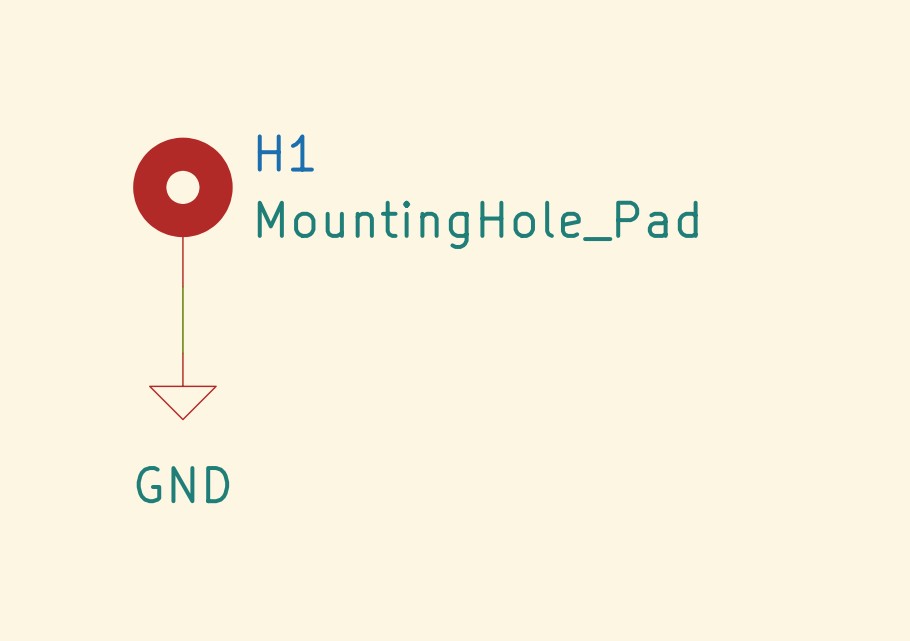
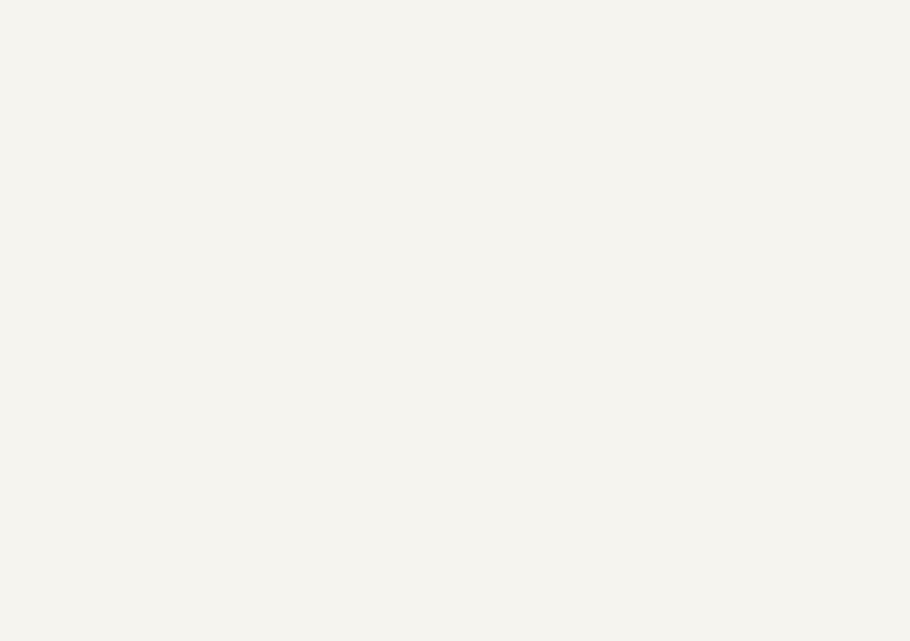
H1: MountingHole_Pad (182, 212) -> none
wire: (182, 286) (182, 353) -> none
power symbol: GND (182, 386) -> none

